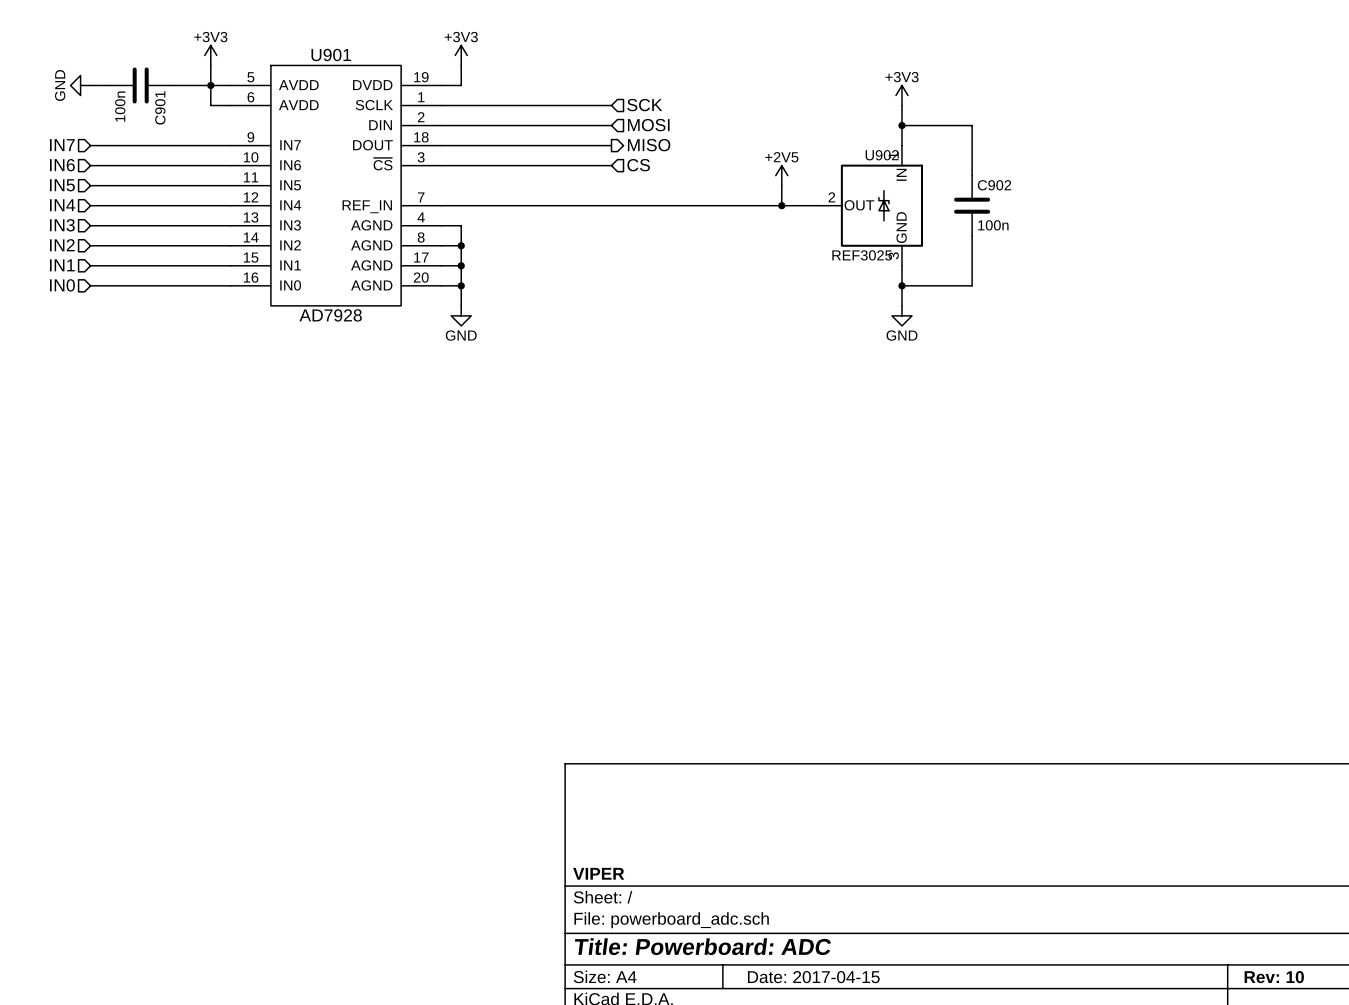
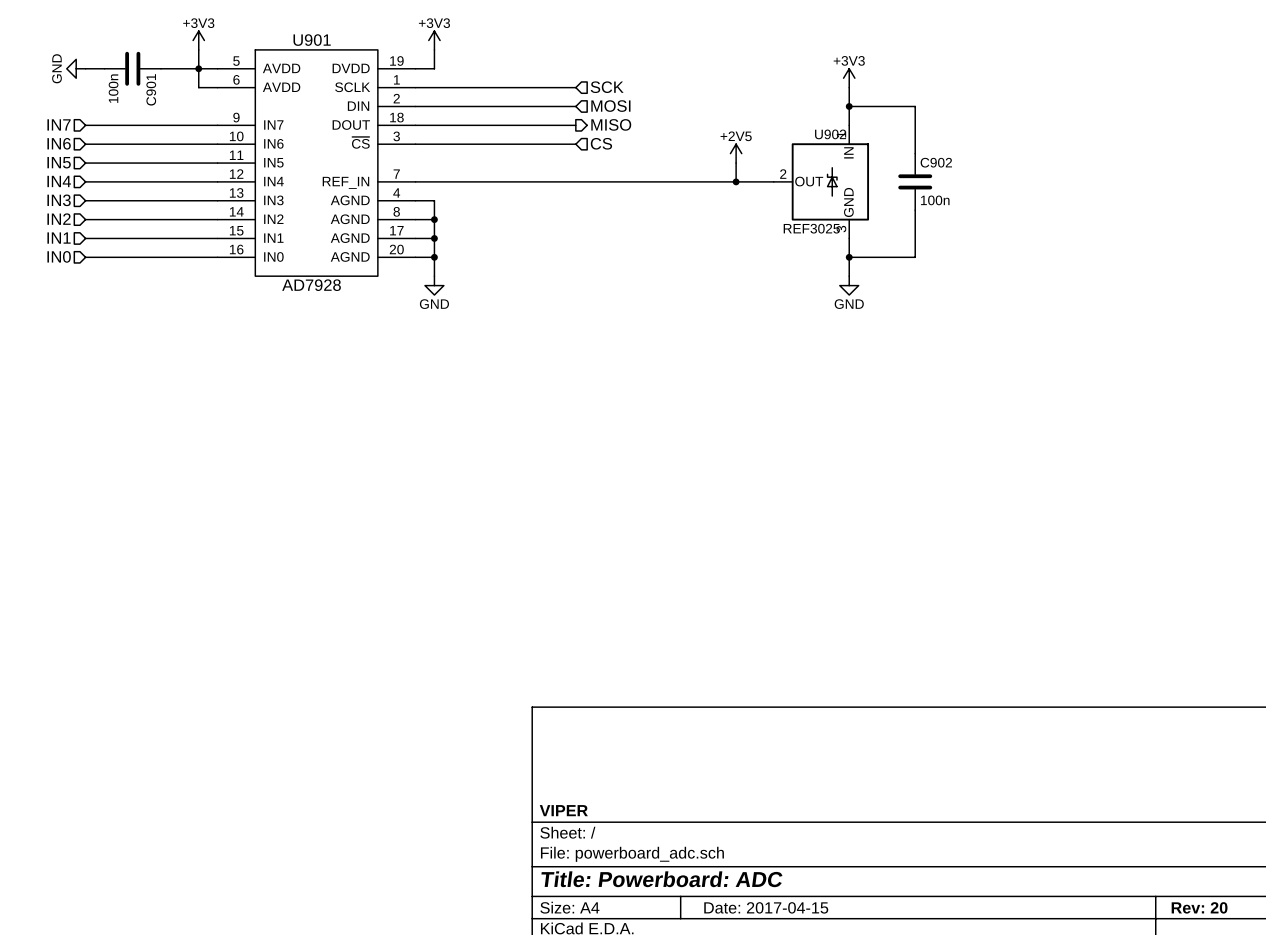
title block: Rev: 10 (1274, 977) -> Rev: 20 (1199, 907)

